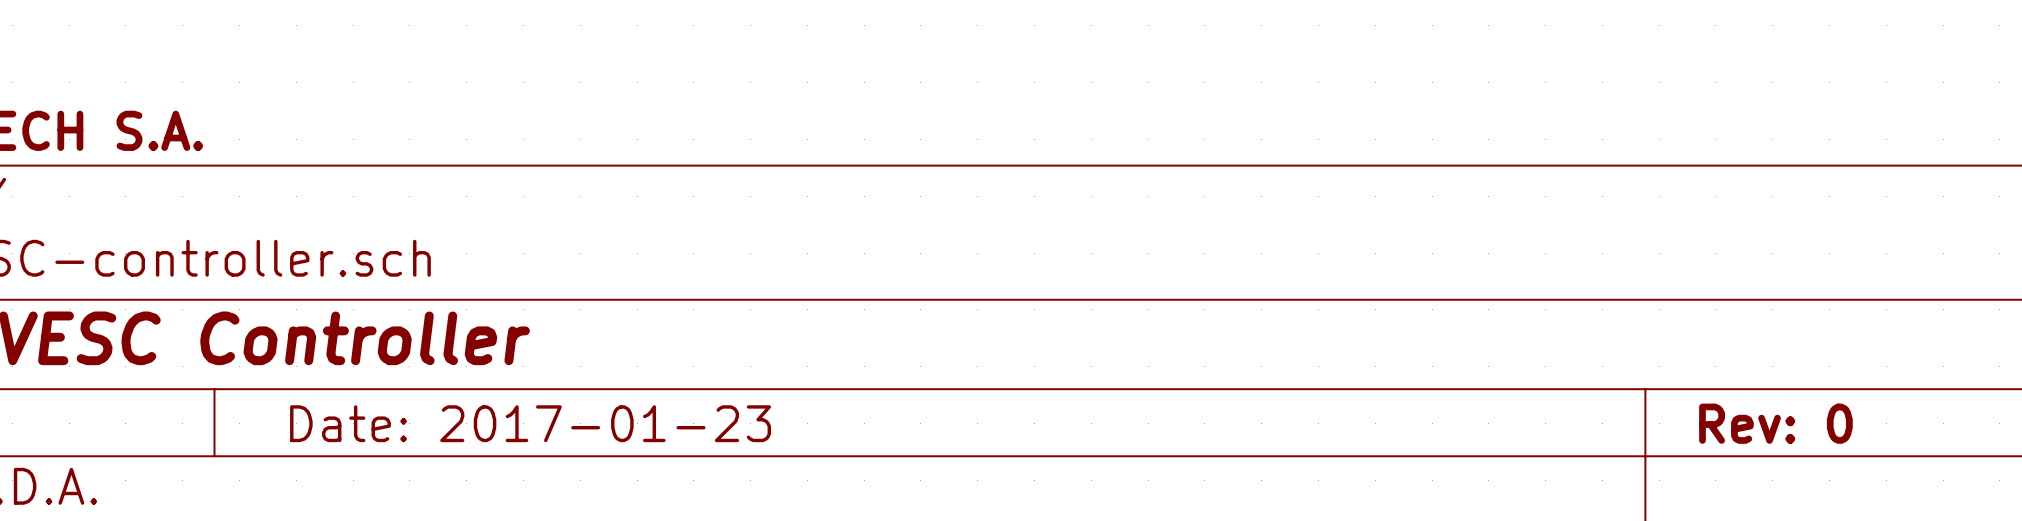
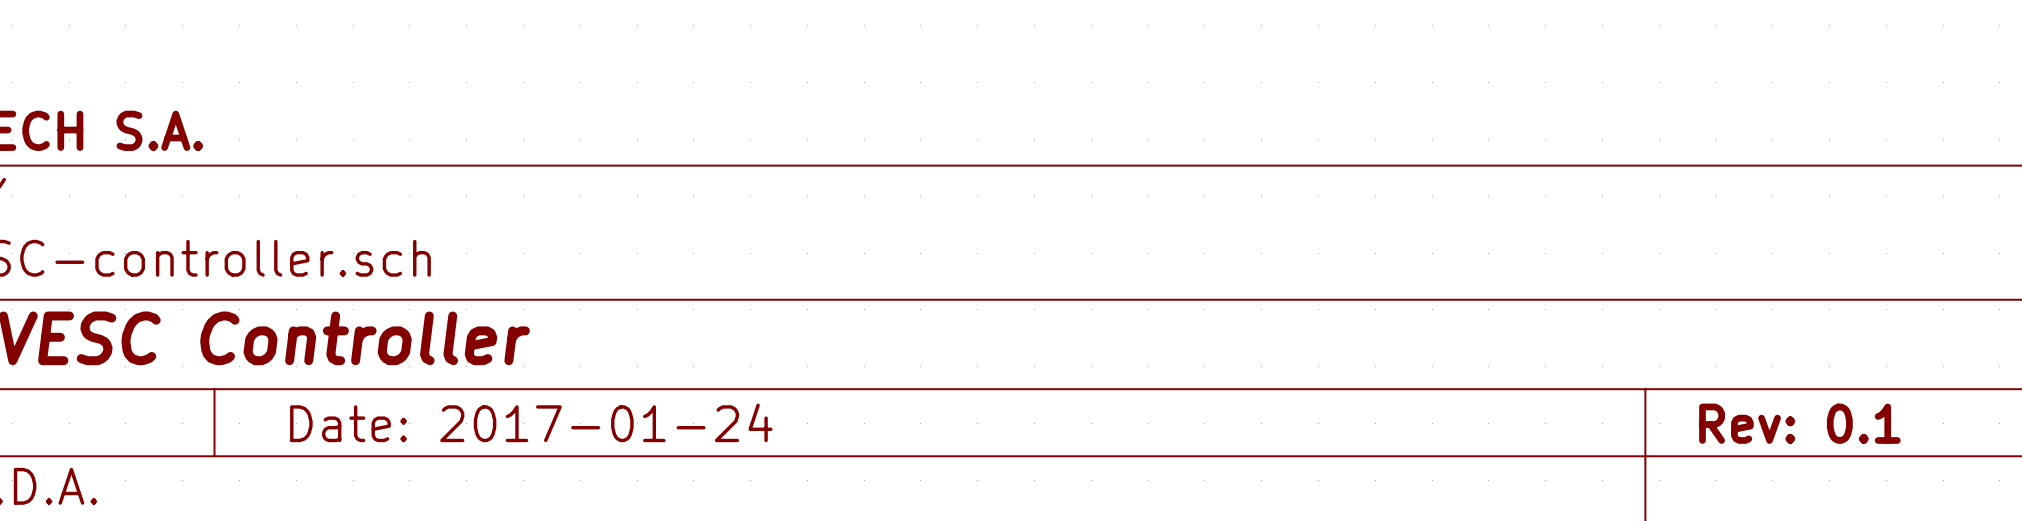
title block: Date: 2017-01-23 (530, 423) -> Date: 2017-01-24 (531, 422)
title block: Rev: 0 (1775, 423) -> Rev: 0.1 (1799, 423)

